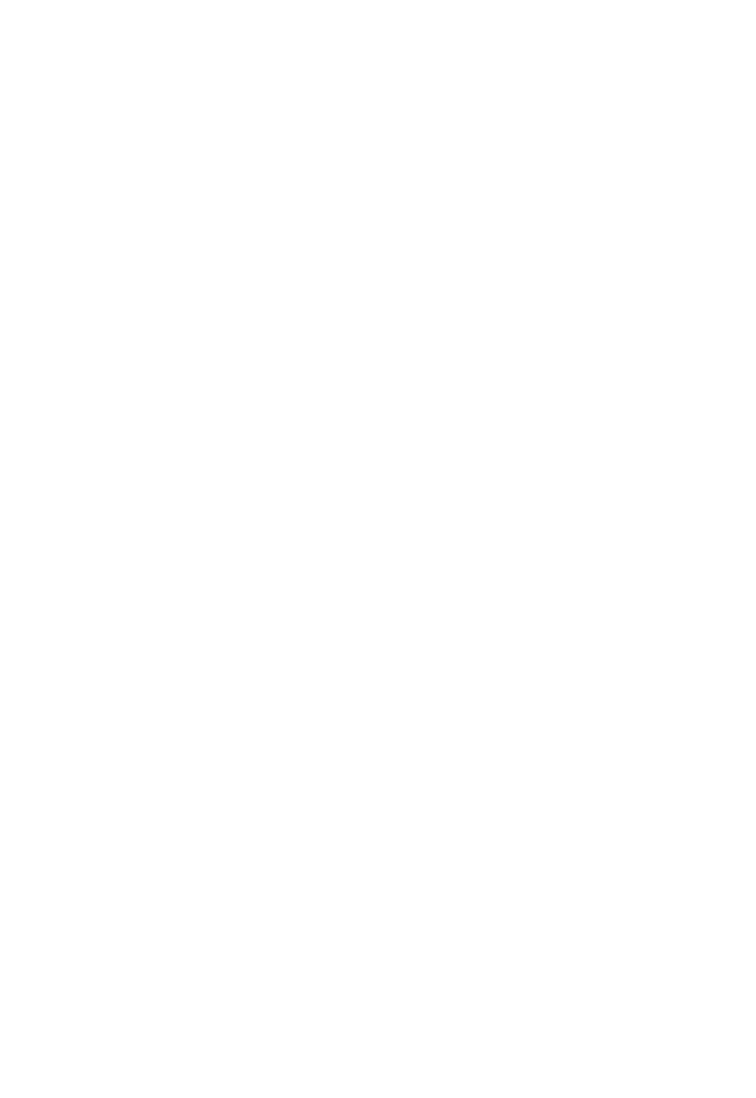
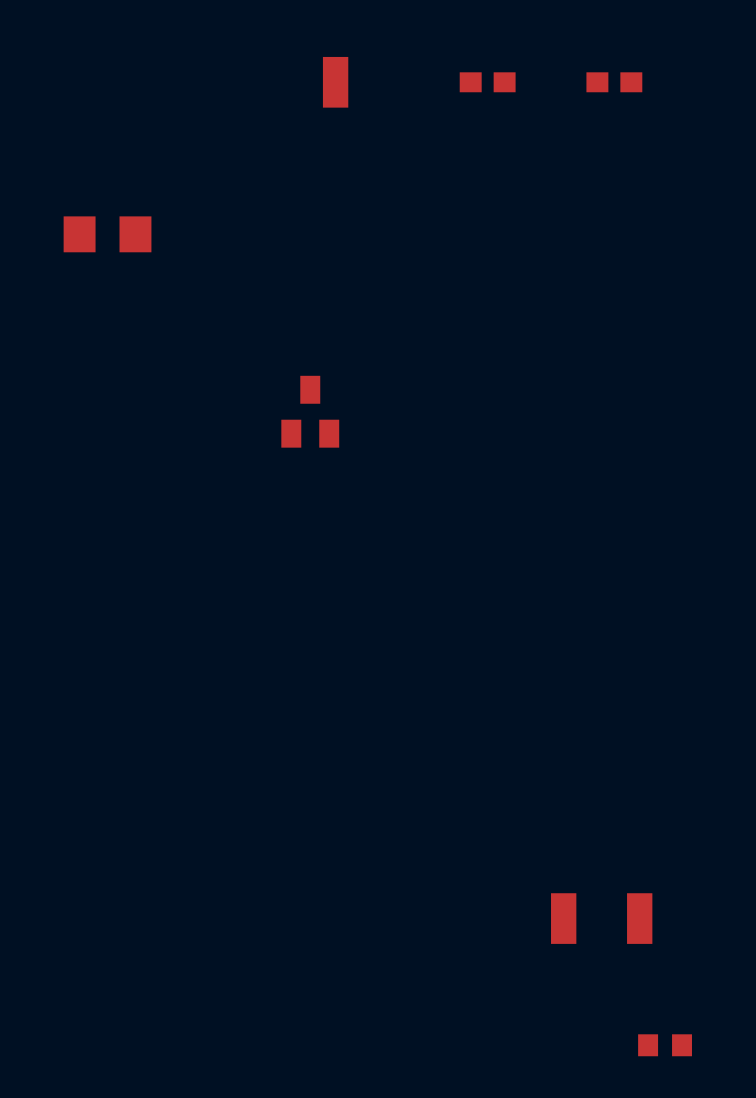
part: none -> (335, 82)
part: none -> (487, 82)
part: none -> (614, 82)
part: none -> (107, 234)
part: none -> (310, 411)
part: none -> (563, 918)
part: none -> (639, 918)
part: none -> (665, 1045)

